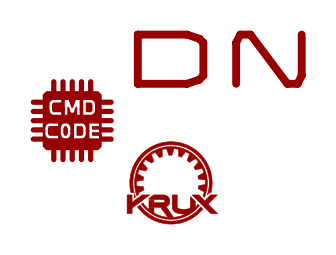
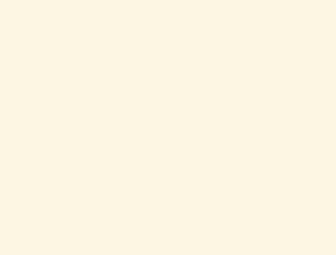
part: (170, 59) -> none
part: (268, 59) -> none
part: (72, 120) -> none
part: (172, 182) -> none

